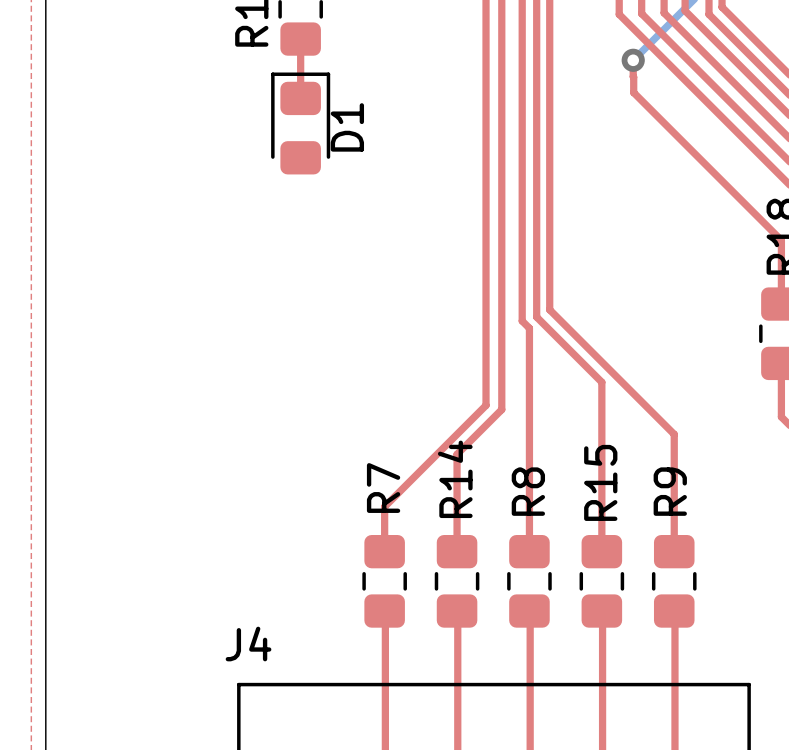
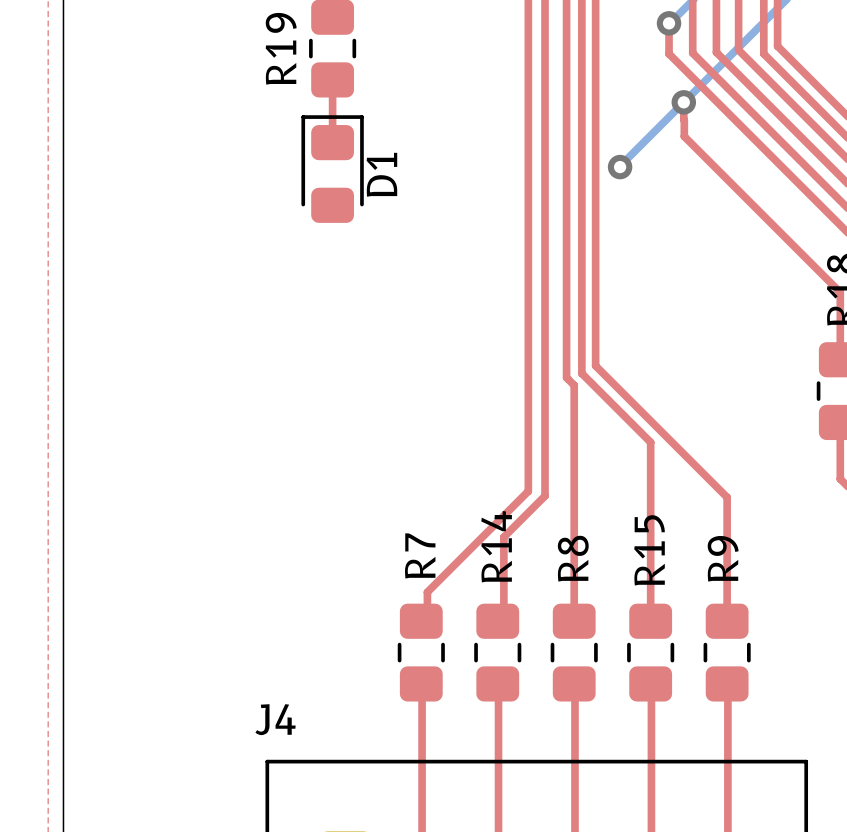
bottom track: none -> (683, 102) (620, 167)
via: none -> (620, 167)
top track: (486, 405) (384, 506) (384, 551) -> (528, 466) (528, 491) (427, 592) (427, 621)
top track: (501, 409) (457, 454) (457, 551) -> (545, 471) (545, 496) (503, 537) (503, 621)

